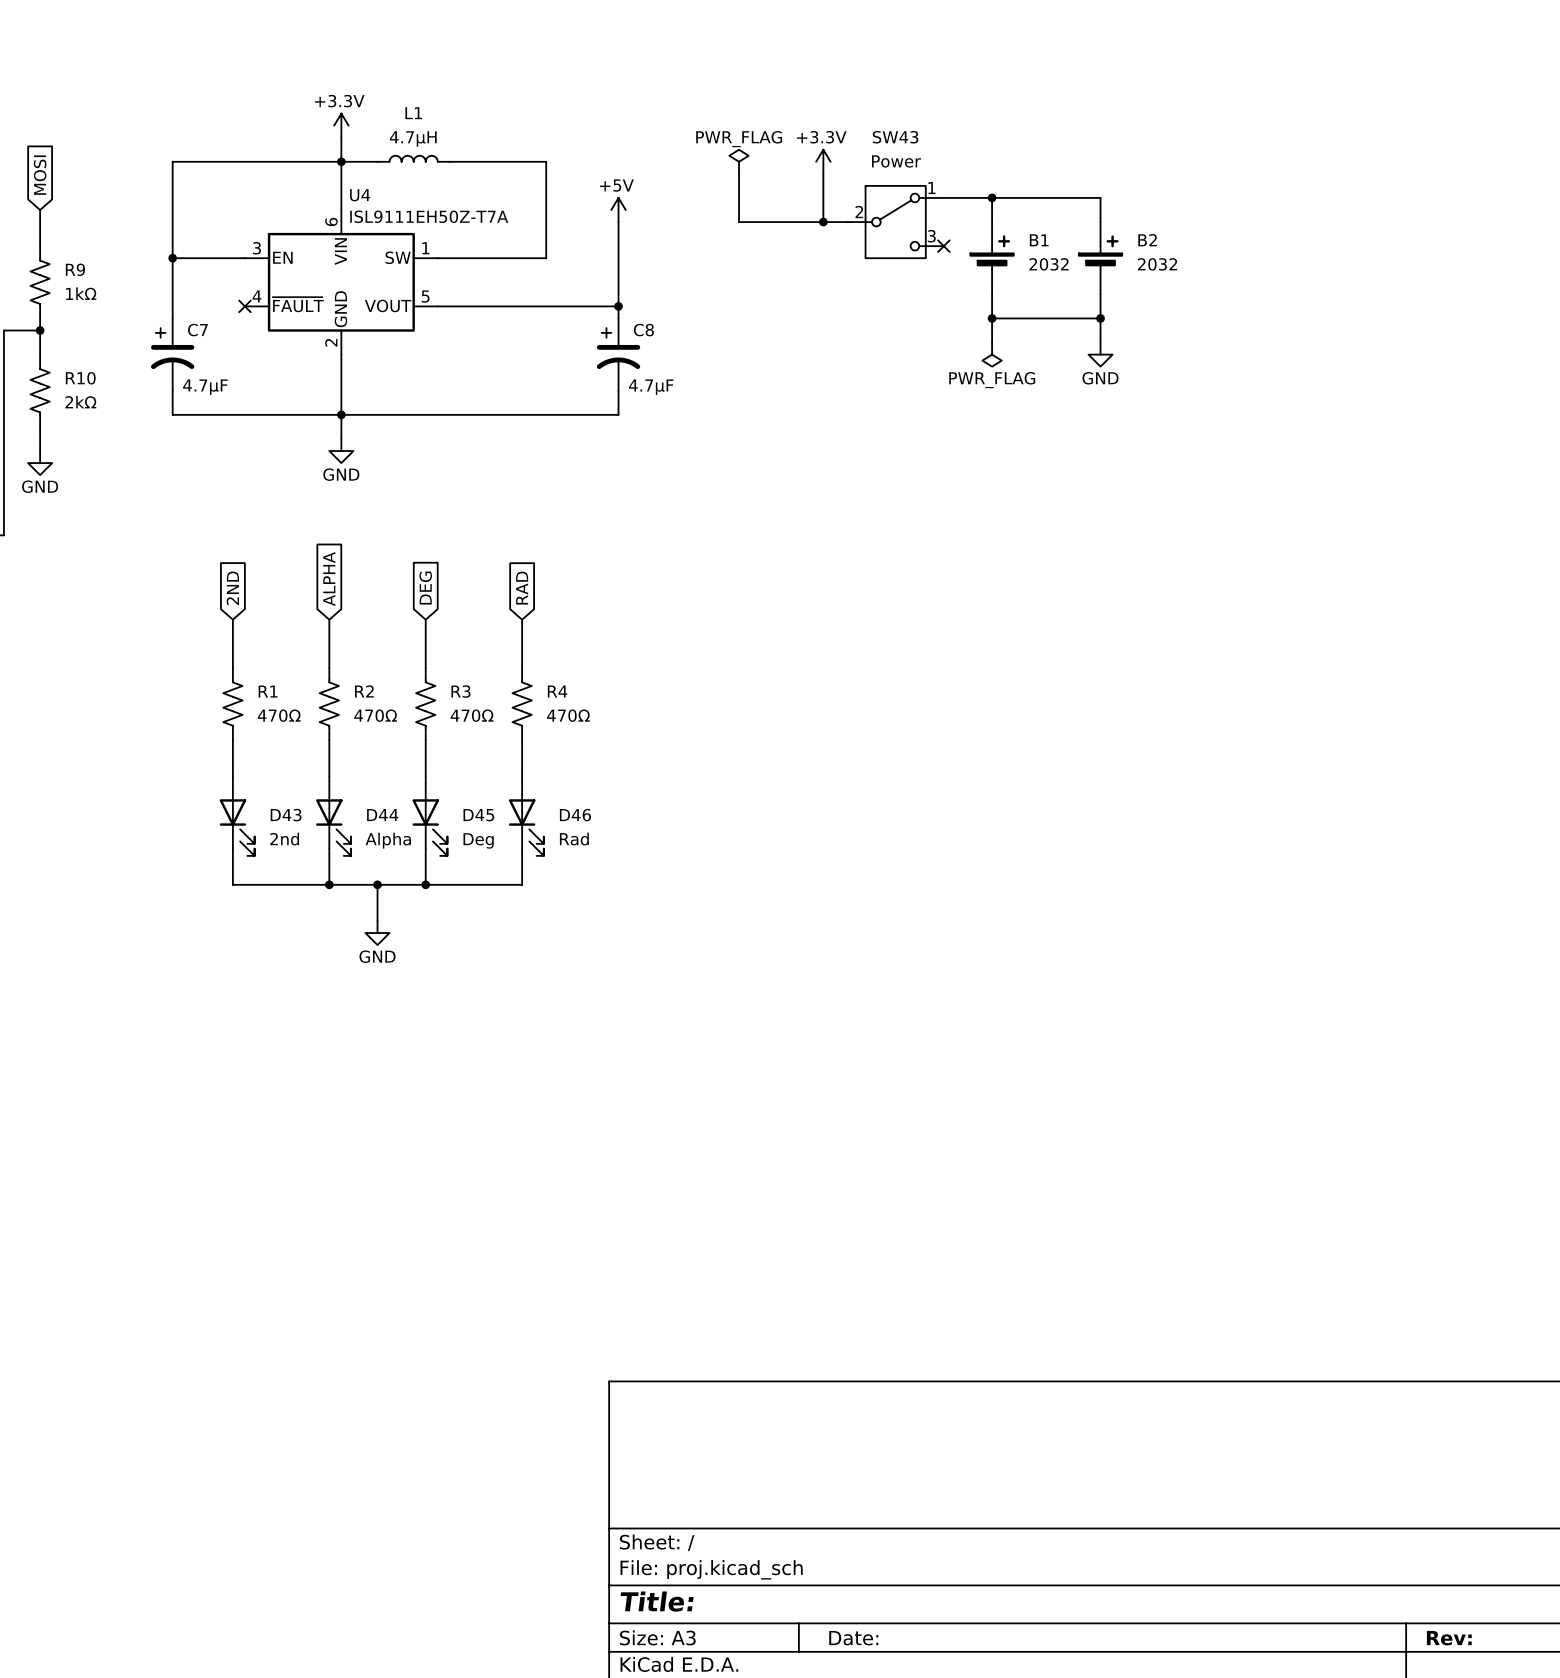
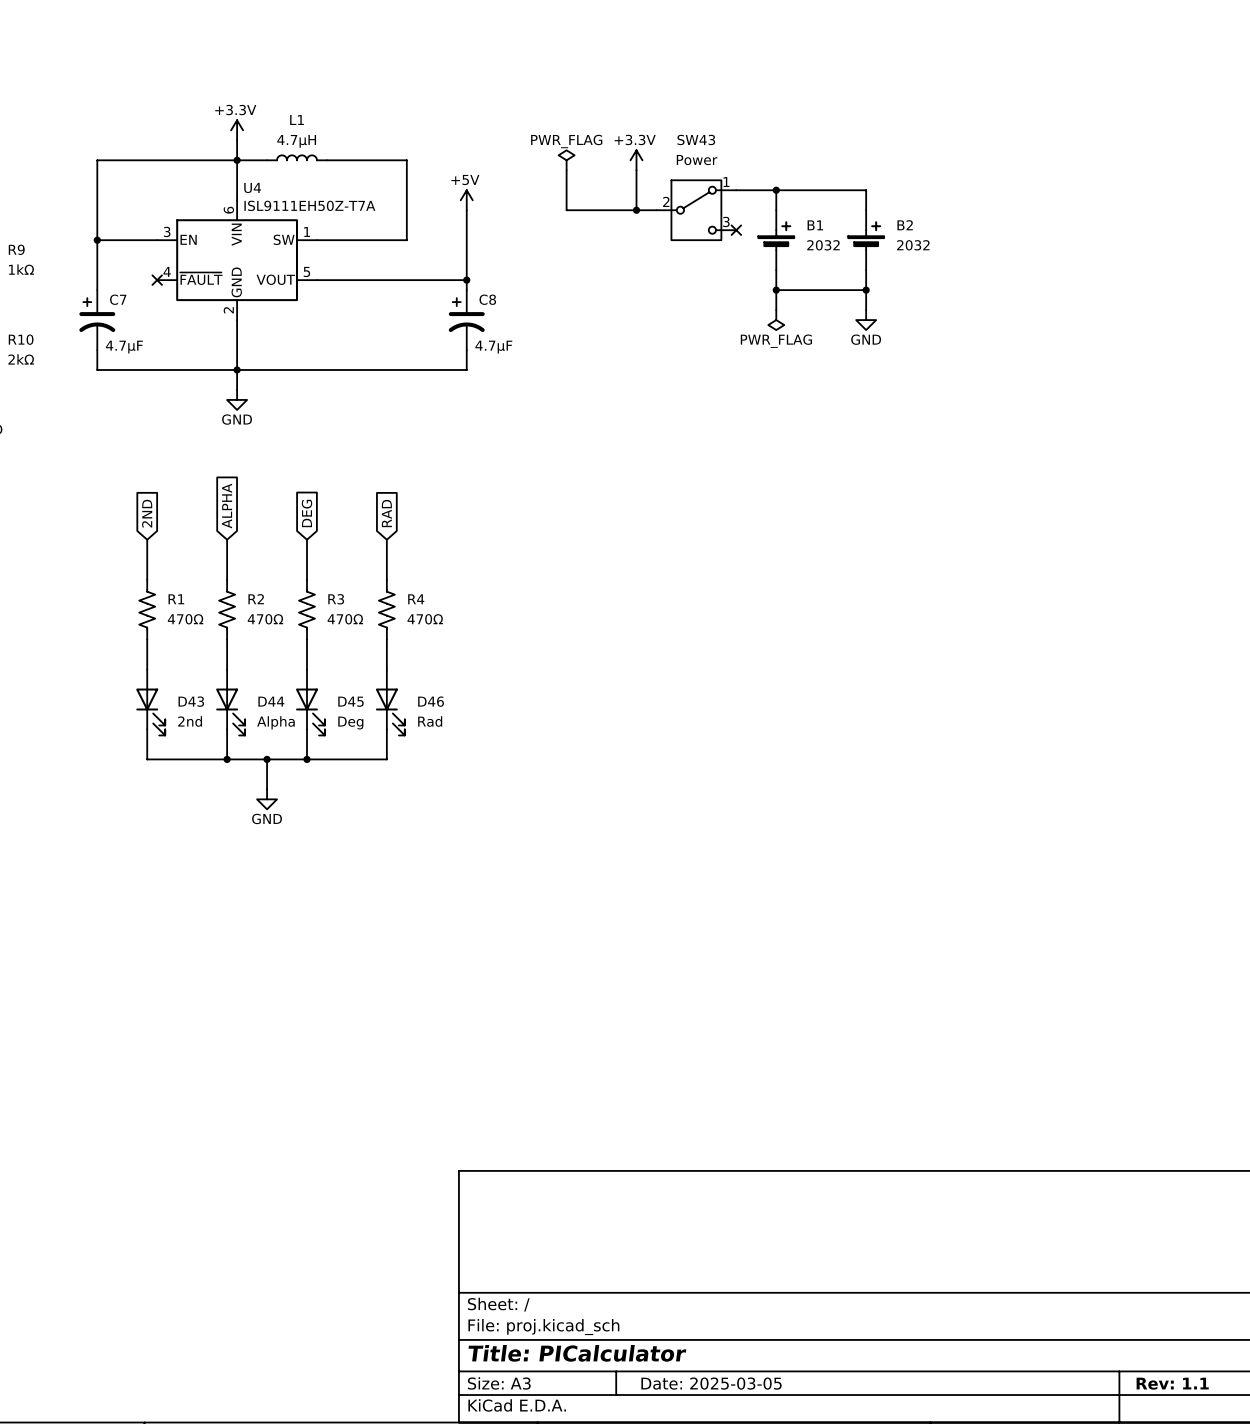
title block: Title: (657, 1601) -> Title: PICalculator (577, 1353)
title block: Date: (853, 1638) -> Date: 2025-03-05 (711, 1383)
title block: Rev: (1449, 1638) -> Rev: 1.1 (1172, 1383)

